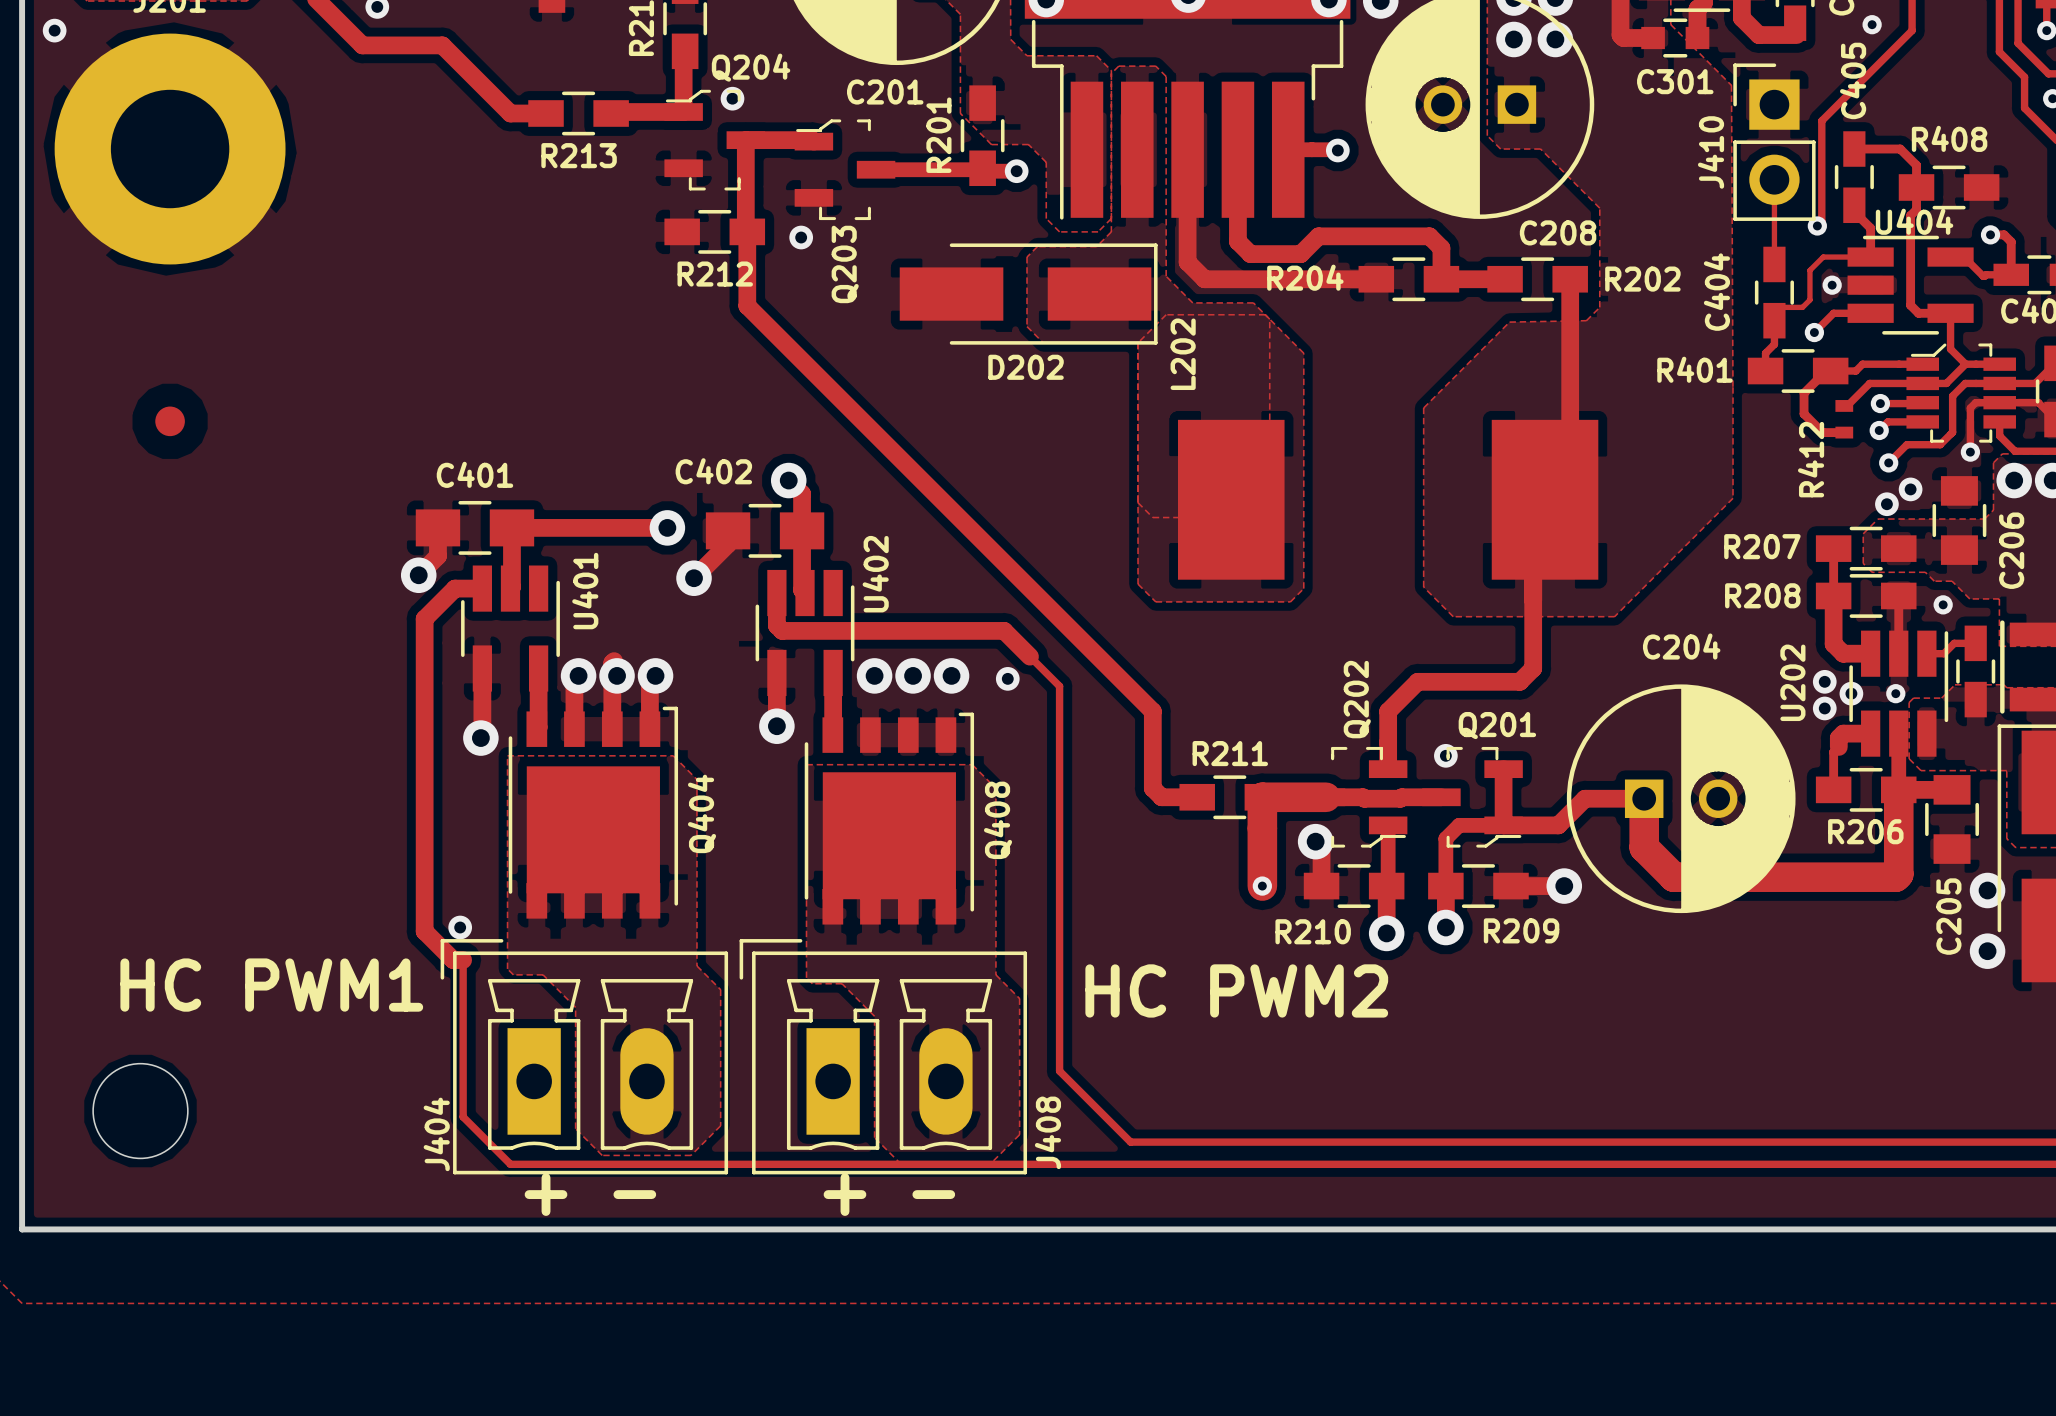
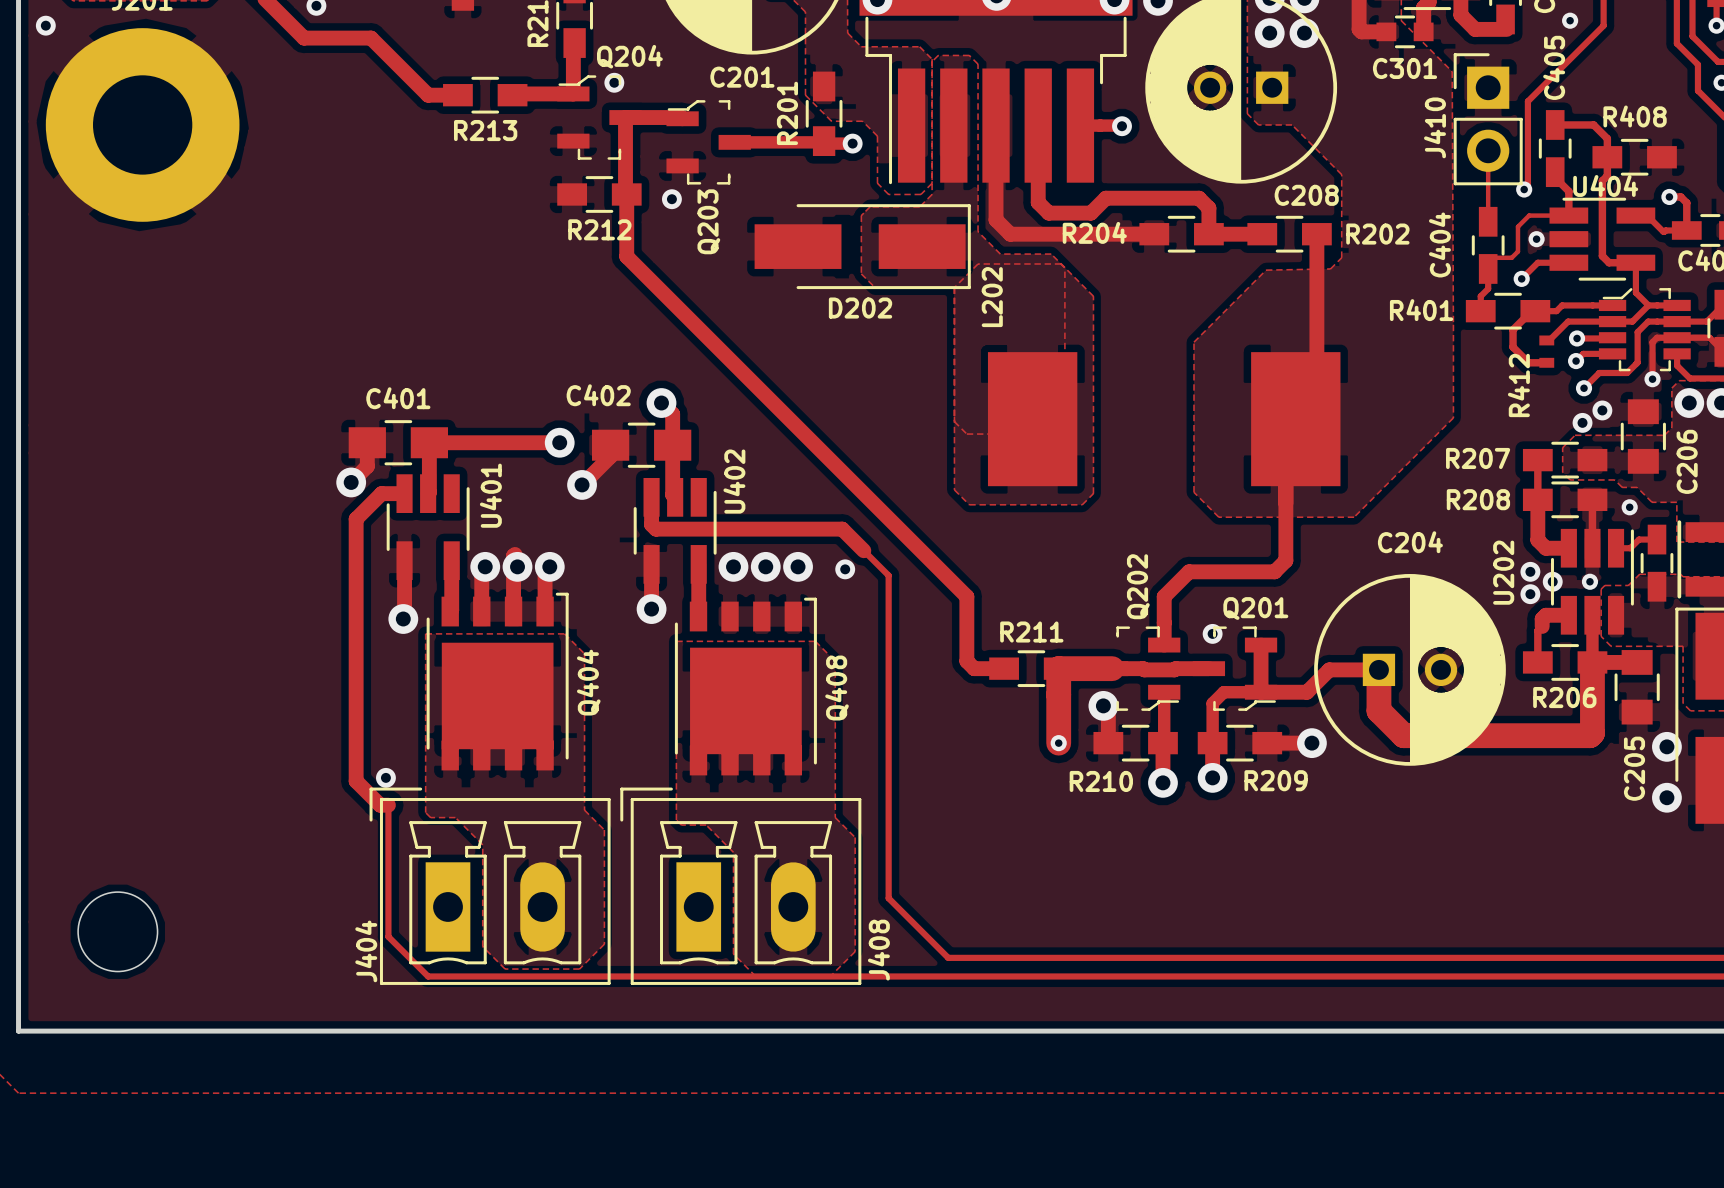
part: (170, 421) -> none
text: HC PWM1 (271, 985) -> none
text: HC PWM2 (1236, 990) -> none
text: + - (590, 1194) -> none
text: + - (889, 1194) -> none

